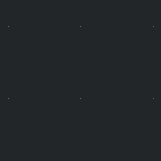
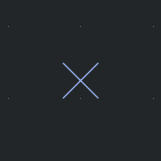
no-connect mark: none -> (80, 80)

